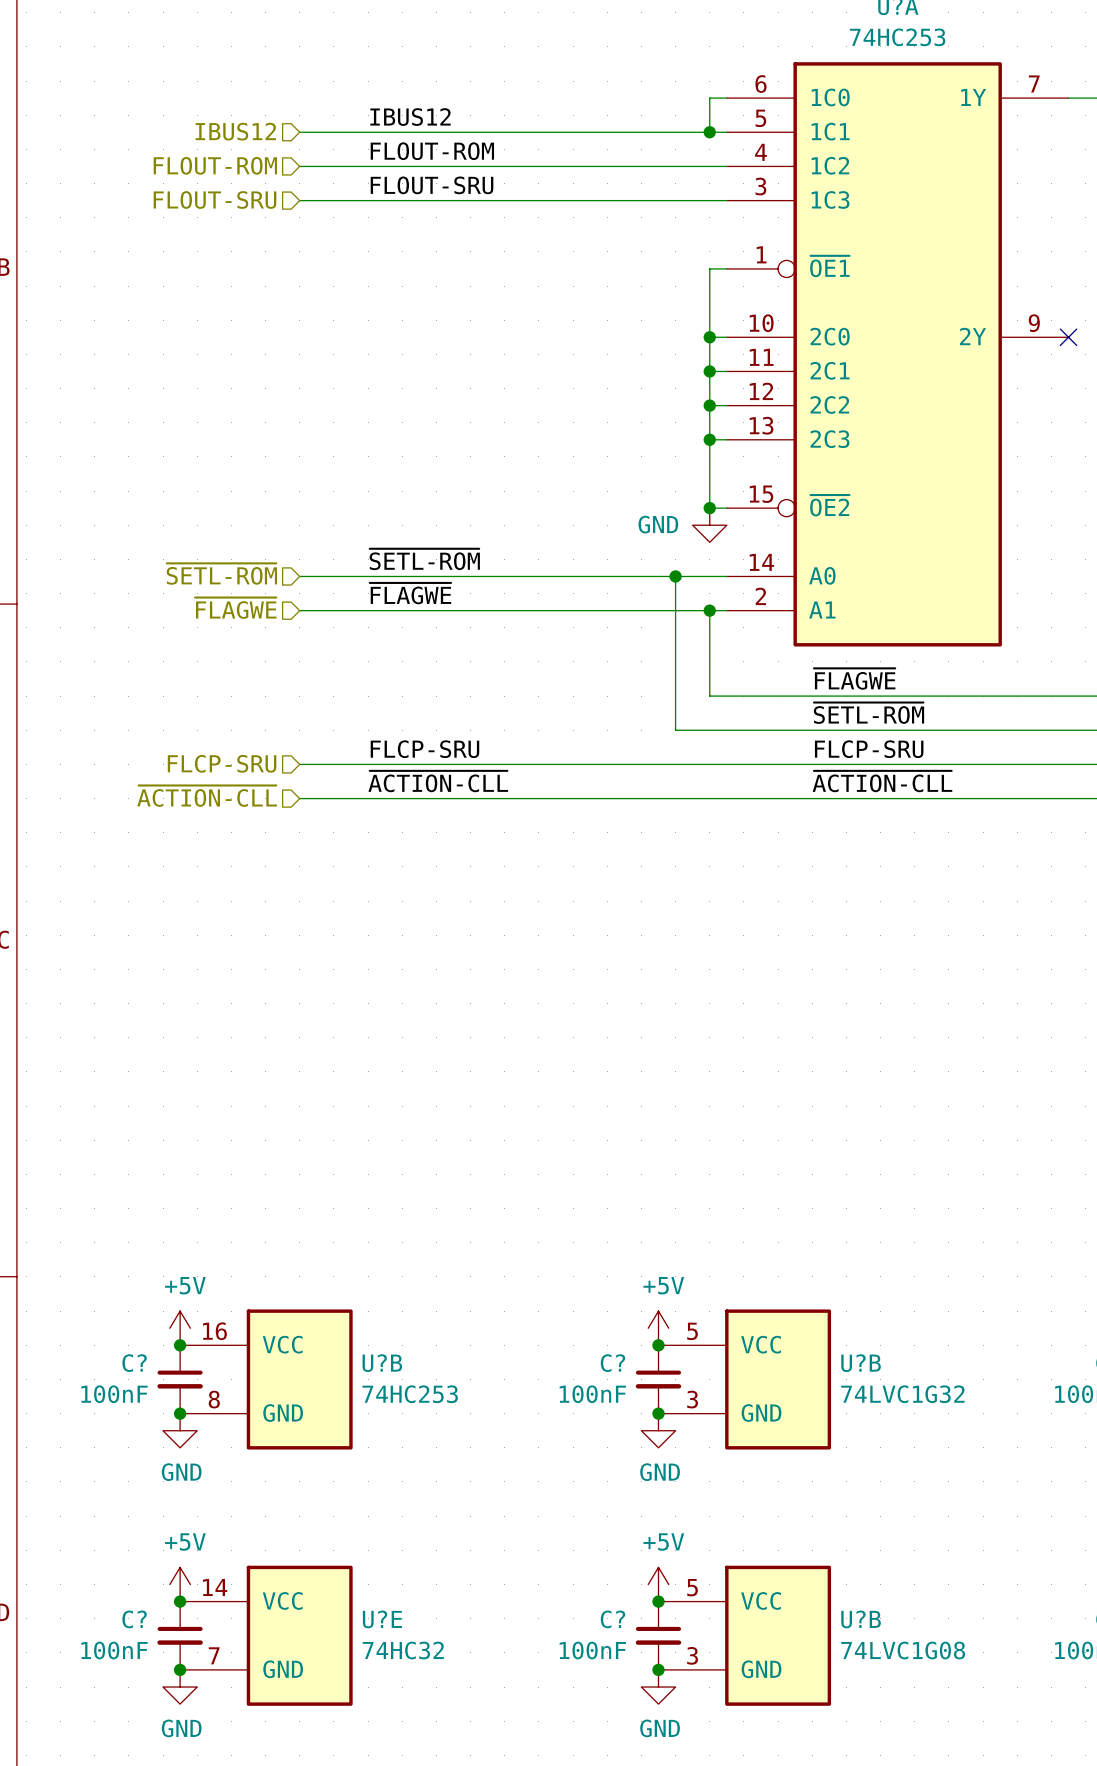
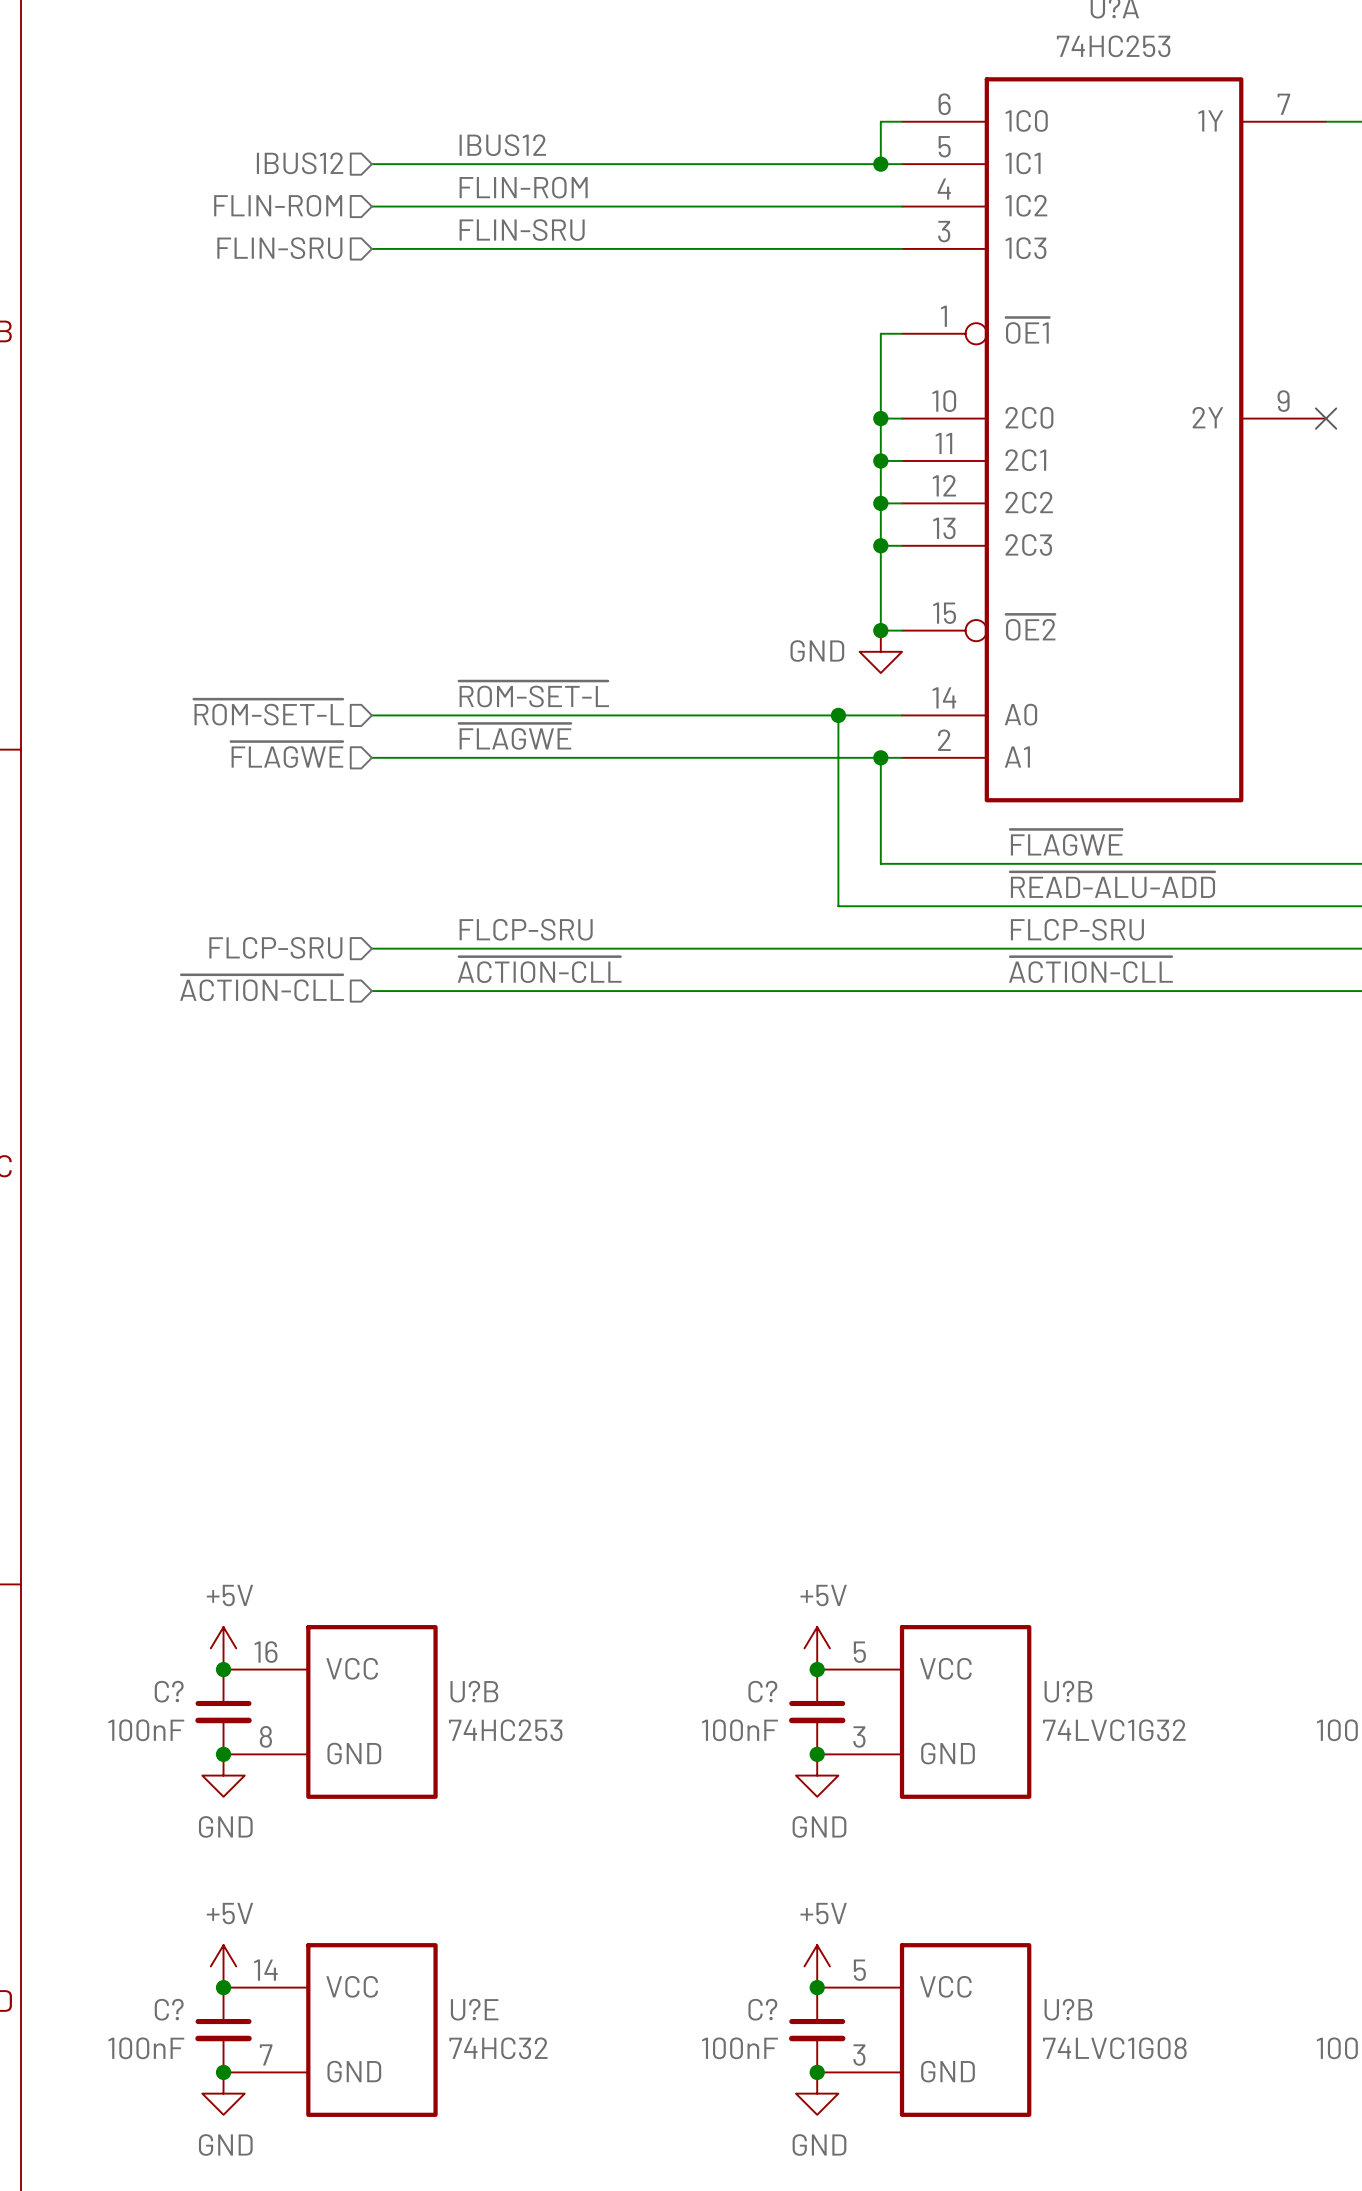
label: FLOUT-ROM (432, 151) -> FLIN-ROM (523, 187)
hierarchical label: FLOUT-ROM (215, 165) -> FLIN-ROM (278, 205)
label: FLOUT-SRU (432, 185) -> FLIN-SRU (522, 230)
hierarchical label: FLOUT-SRU (215, 199) -> FLIN-SRU (279, 248)
label: ~{SETL-ROM} (424, 559) -> ~{ROM-SET-L} (533, 694)
hierarchical label: ~{SETL-ROM} (221, 574) -> ~{ROM-SET-L} (268, 712)
label: ~{SETL-ROM} (868, 713) -> ~{READ-ALU-ADD} (1112, 885)

